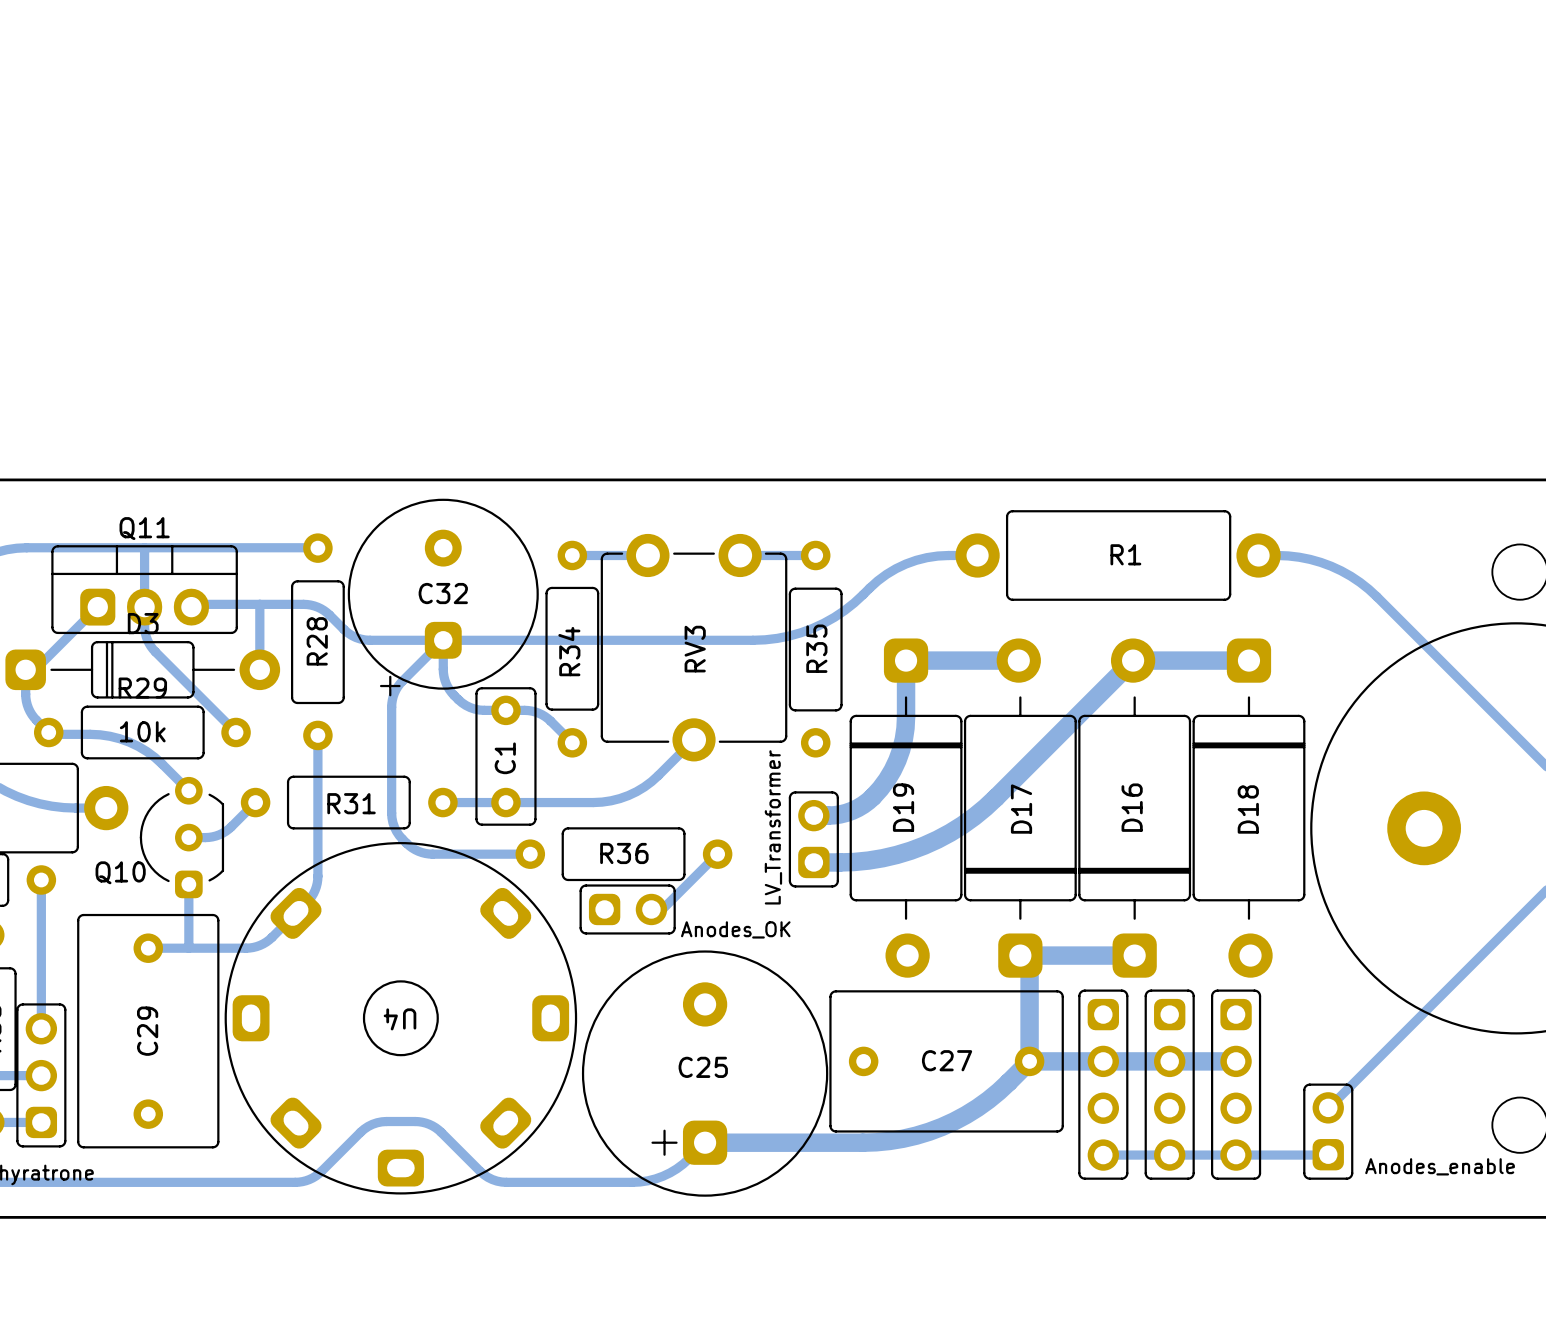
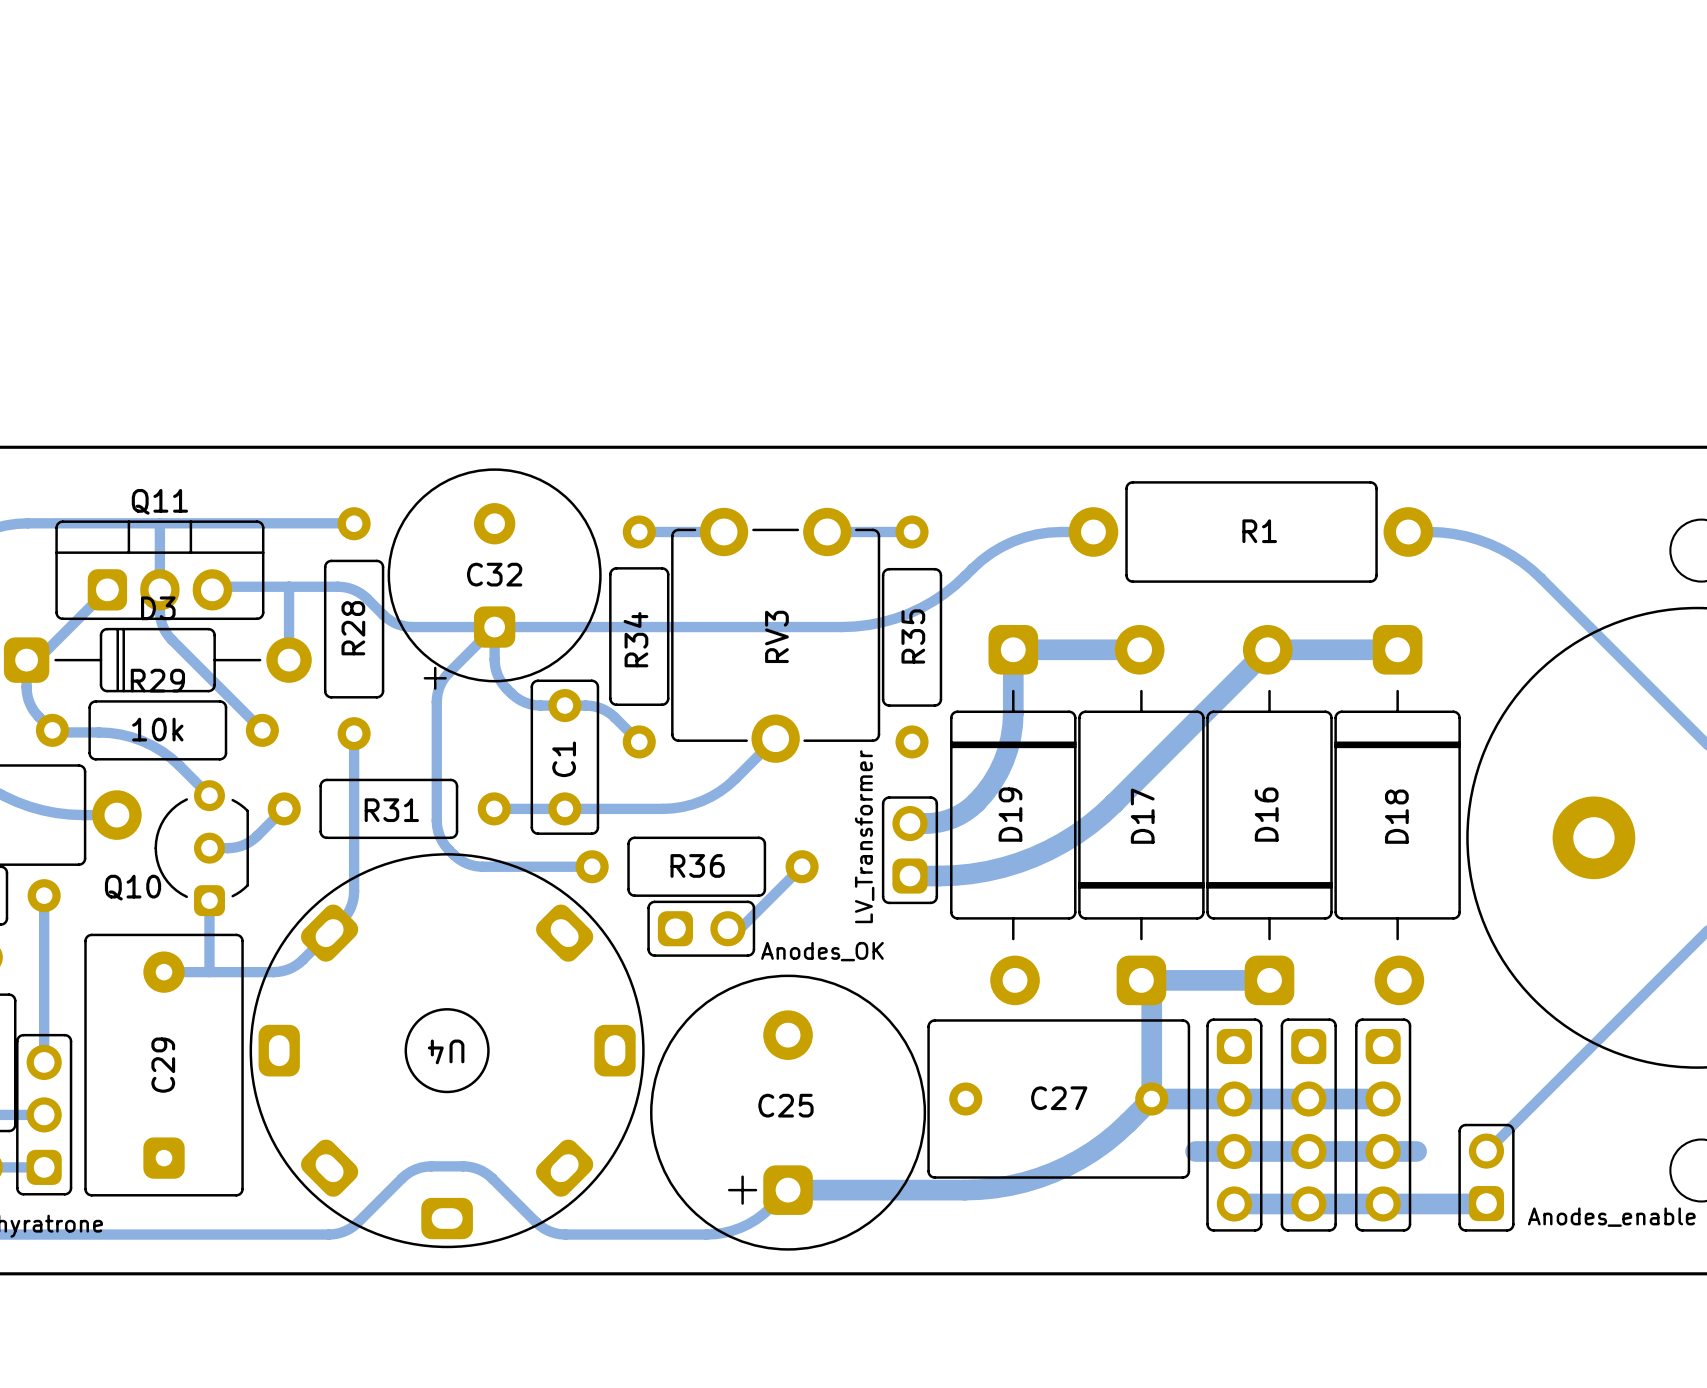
C29 footprint: [77, 913, 220, 1149] -> [84, 933, 244, 1197]
bottom track: none -> (1195, 1151) (1416, 1151)
bottom track width: thin (1103, 1155) (1327, 1155) -> thick (1234, 1203) (1486, 1203)

